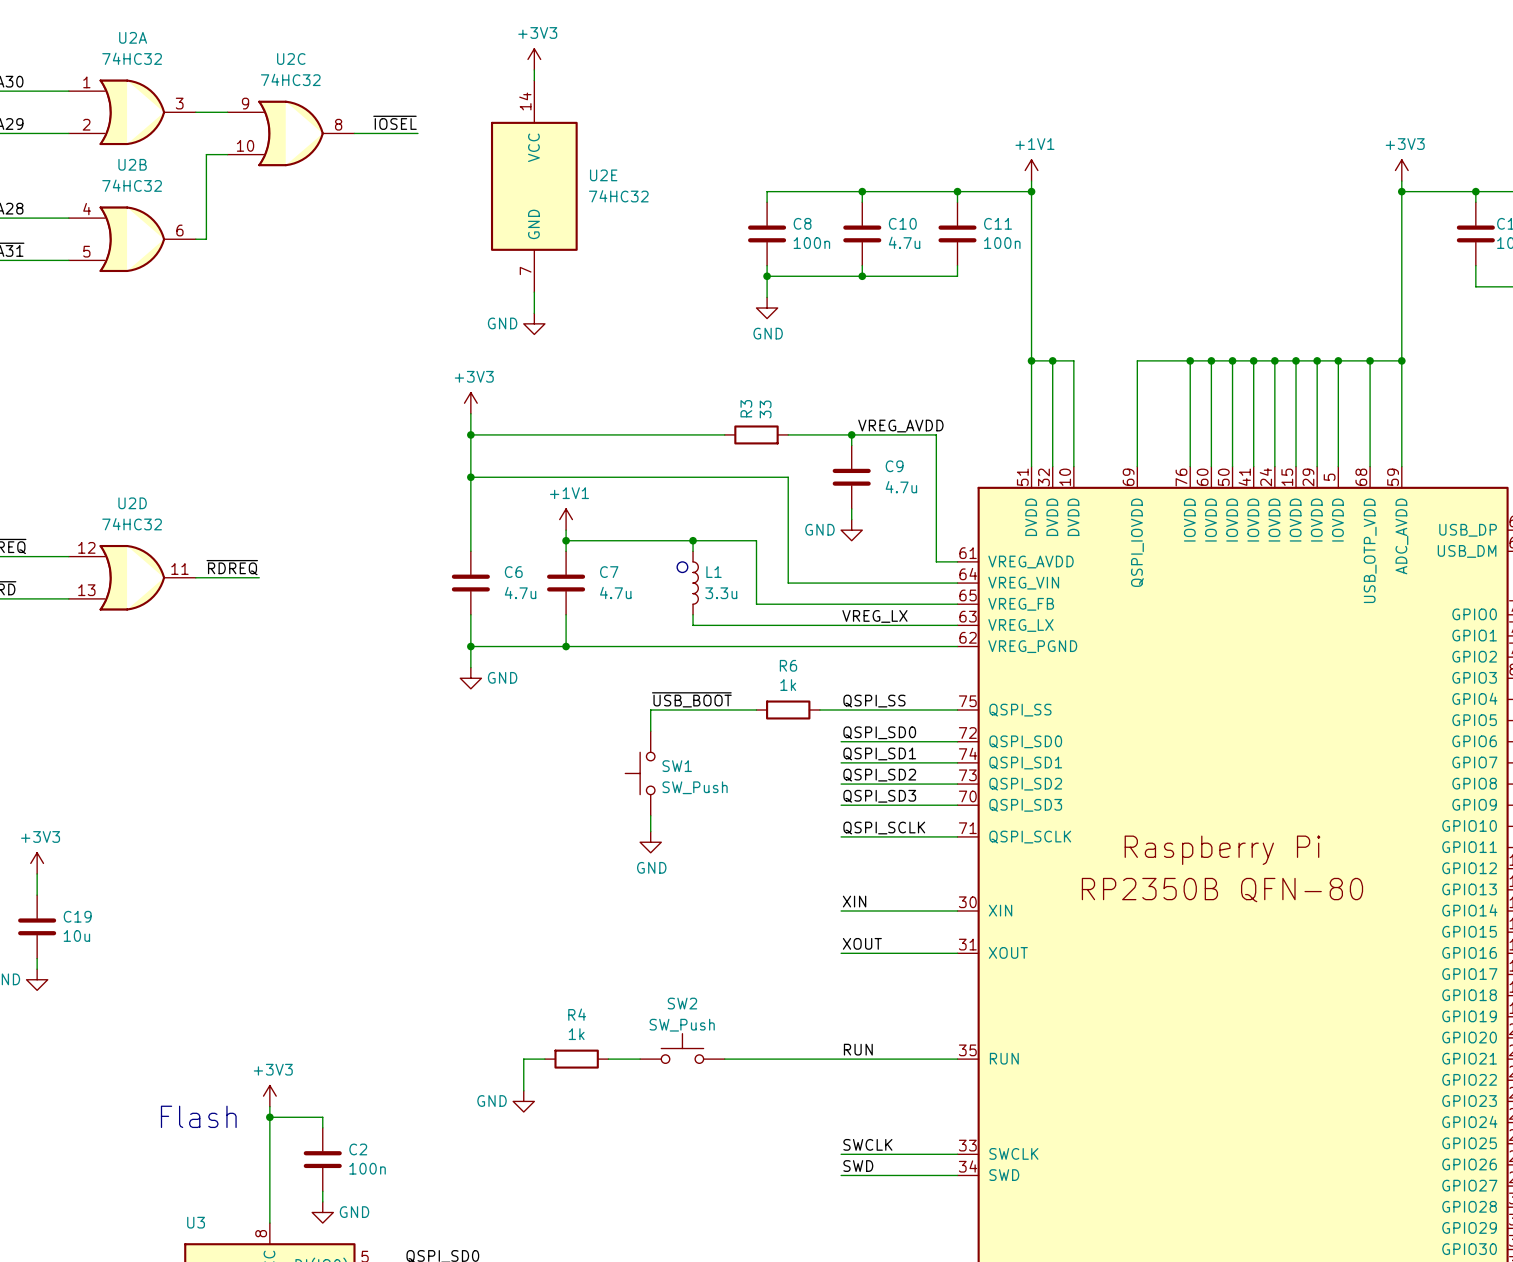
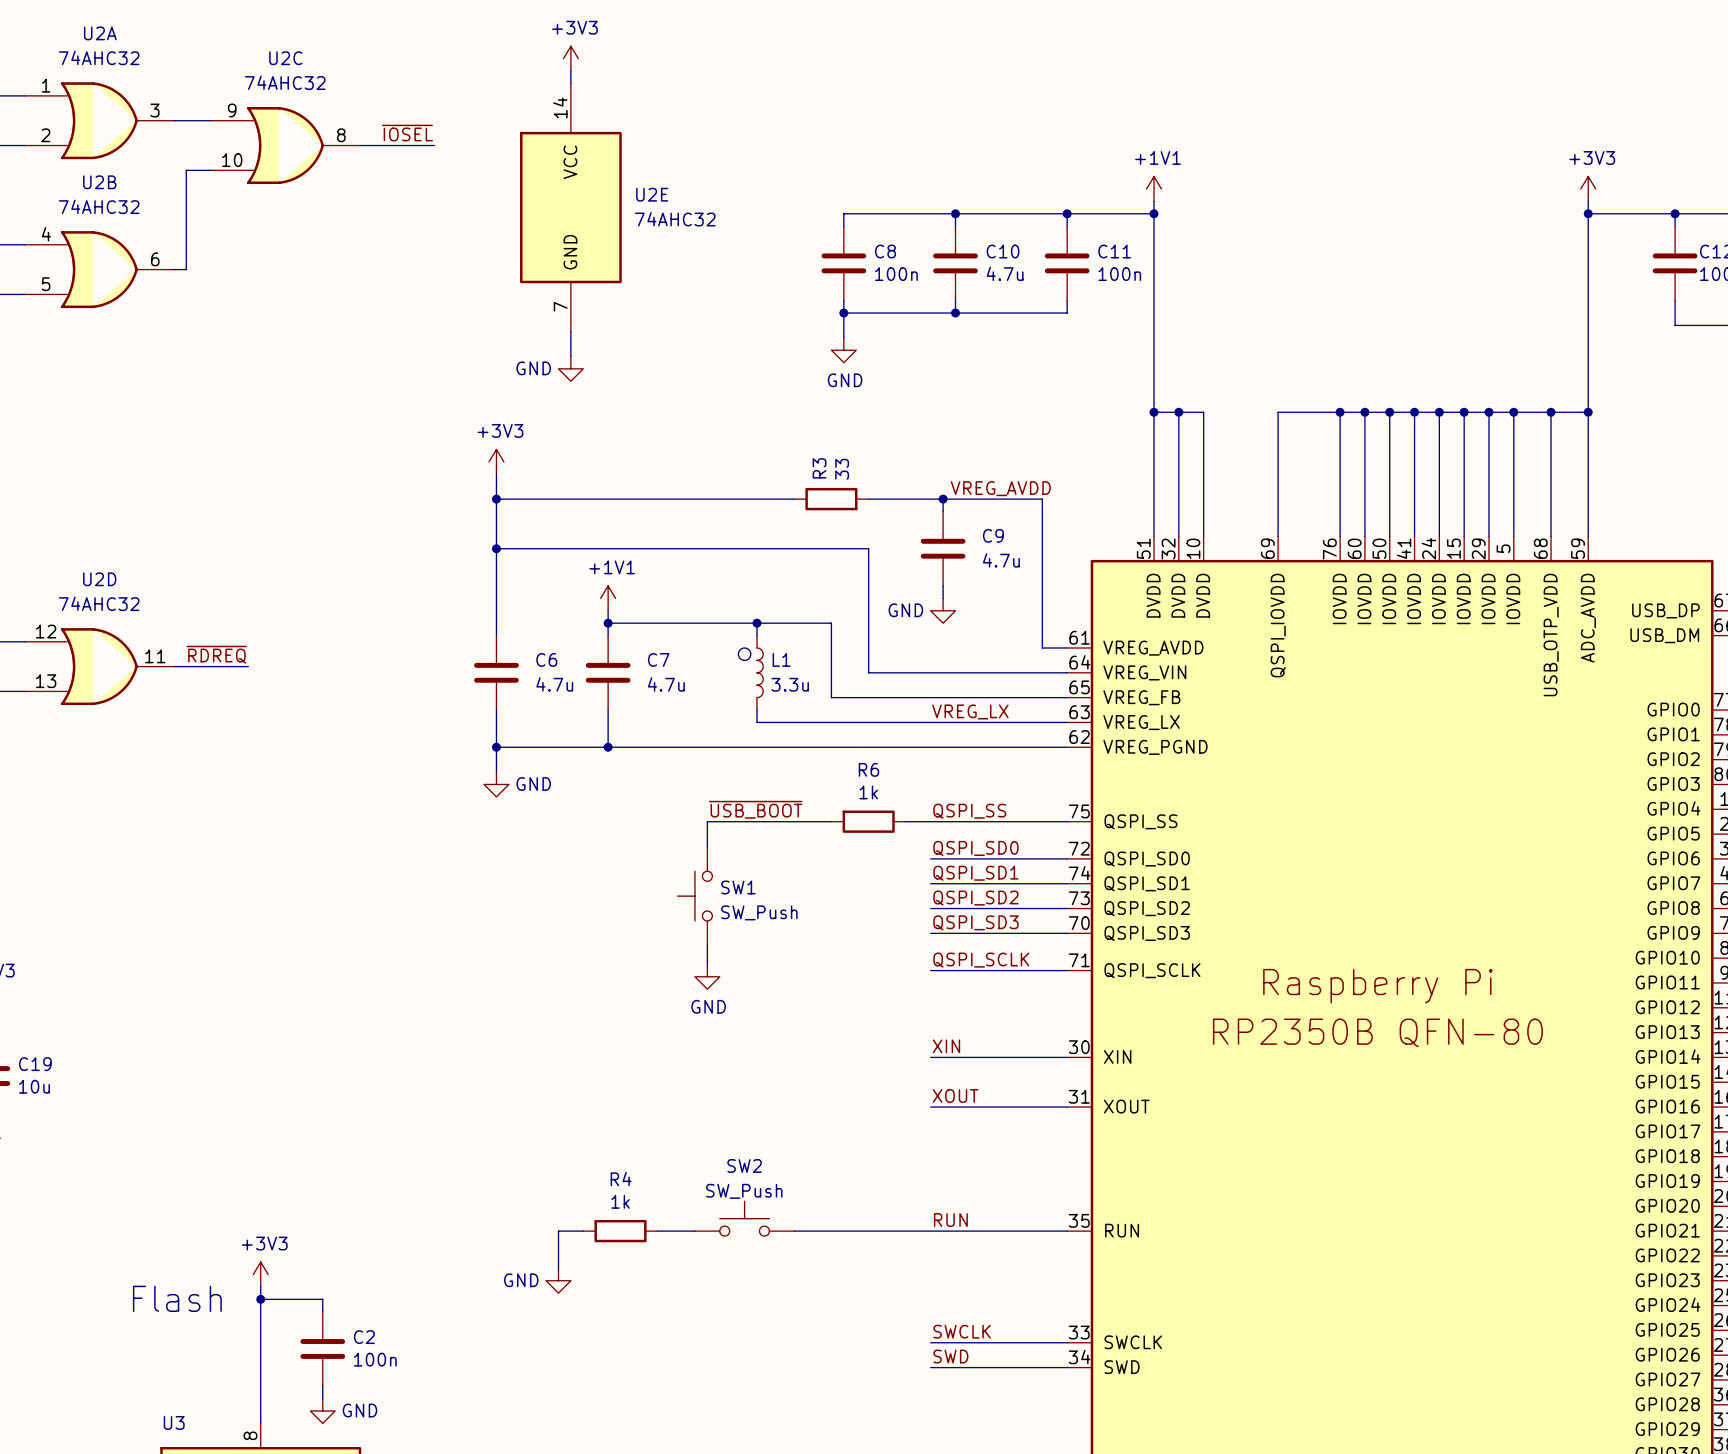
U2A value: 74HC32 (132, 58) -> 74AHC32 (99, 57)
U2C value: 74HC32 (290, 79) -> 74AHC32 (285, 82)
U2B value: 74HC32 (132, 185) -> 74AHC32 (99, 206)
U2E value: 74HC32 (618, 196) -> 74AHC32 (675, 219)
U2D value: 74HC32 (132, 524) -> 74AHC32 (99, 603)

